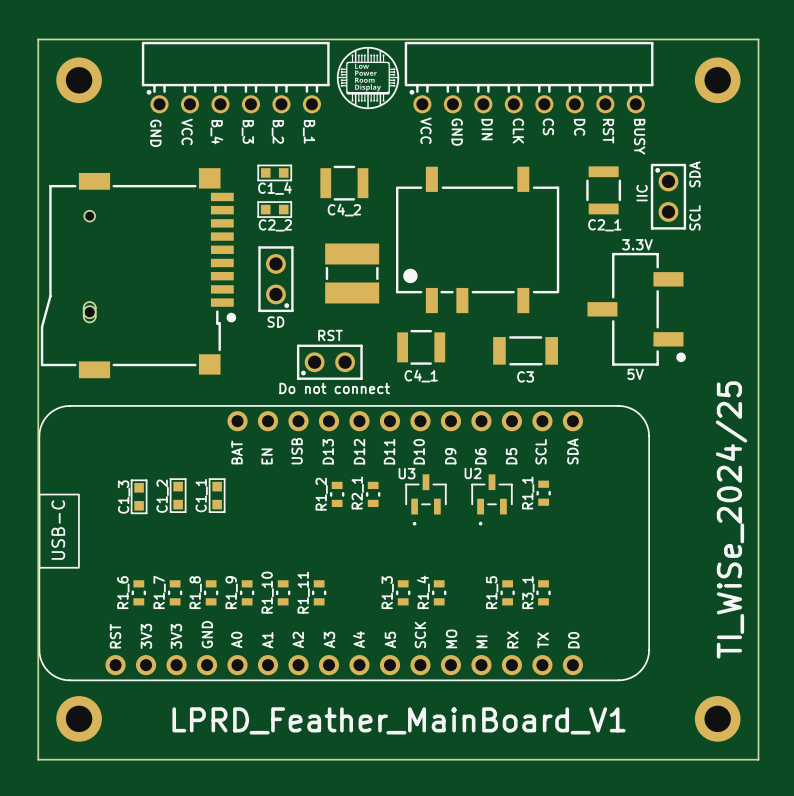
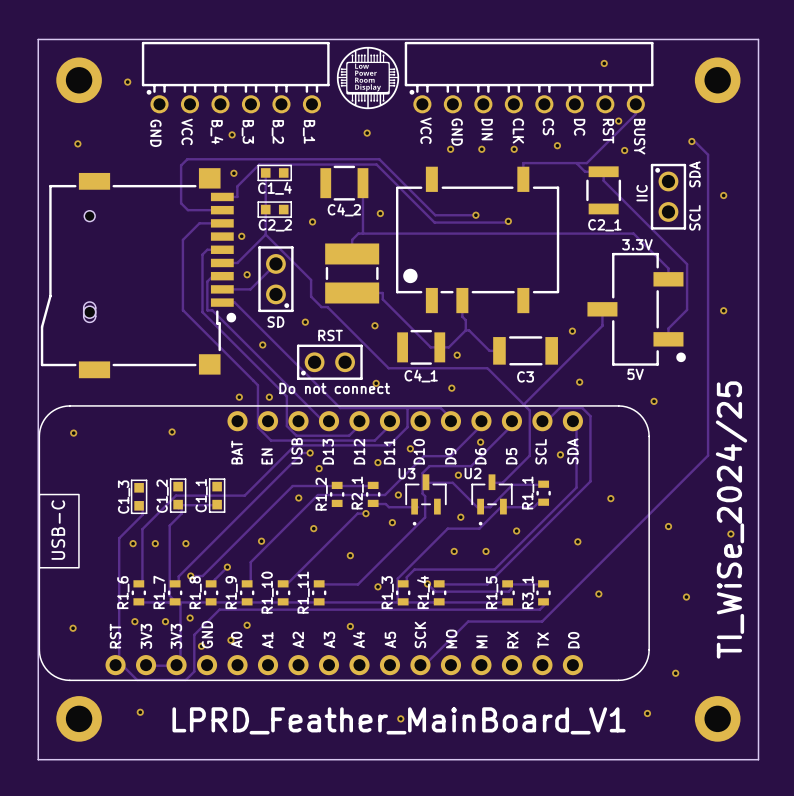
via: none -> (604, 63)
via: none -> (127, 82)
track: none -> (635, 104) (635, 114) (586, 163) (523, 163) (523, 179)
via: none -> (618, 121)
via: none -> (367, 133)
via: none -> (232, 134)
via: none -> (691, 141)
track: none -> (695, 142) (708, 154) (708, 455) (542, 621) (468, 621) (424, 665)
via: none -> (77, 143)
via: none -> (557, 145)
via: none -> (450, 149)
via: none -> (481, 149)
via: none -> (514, 149)
via: none -> (624, 150)
track: none -> (577, 163) (585, 171) (603, 171) (603, 180) (687, 264) (687, 309) (668, 328) (668, 339)
track: none -> (265, 172) (265, 234)
via: none -> (233, 173)
track: none -> (362, 183) (362, 233)
via: none -> (723, 195)
track: none -> (222, 196) (237, 196) (237, 186) (259, 164) (376, 164) (434, 222) (508, 221)
track: none -> (222, 210) (187, 210) (181, 203) (181, 165) (187, 159) (379, 159) (435, 215) (475, 215)
via: none -> (380, 213)
via: none -> (475, 215)
via: none -> (312, 221)
via: none -> (508, 221)
track: none -> (222, 223) (199, 223) (182, 239) (182, 310) (253, 380)
track: none -> (265, 234) (237, 262) (222, 262)
track: none -> (265, 234) (311, 280) (311, 296) (321, 307) (327, 307) (388, 368) (486, 368)
via: none -> (241, 236)
track: none -> (222, 249) (207, 249) (202, 254) (202, 312) (286, 396) (286, 426) (296, 435) (349, 435) (363, 421)
track: none -> (352, 253) (352, 239) (358, 233) (633, 233) (668, 268) (668, 279)
track: none -> (275, 263) (250, 289) (222, 289)
via: none -> (247, 274)
track: none -> (222, 276) (212, 276) (207, 281) (207, 310) (212, 310) (323, 421) (332, 421)
track: none -> (352, 292) (382, 292) (382, 299) (430, 347) (448, 347) (465, 330)
track: none -> (462, 300) (462, 316) (465, 320) (465, 330)
track: none -> (222, 302) (234, 302) (340, 408) (440, 408) (454, 421)
track: none -> (602, 309) (602, 325) (523, 404)
via: none -> (723, 310)
via: none -> (305, 322)
via: none -> (374, 325)
track: none -> (465, 330) (469, 330) (489, 350) (499, 350)
via: none -> (572, 331)
via: none -> (262, 344)
via: none -> (457, 355)
track: none -> (487, 368) (529, 410) (529, 455) (502, 482) (495, 482)
track: none -> (253, 381) (257, 385) (257, 427) (271, 440) (374, 440) (393, 421)
via: none -> (579, 382)
via: none -> (376, 383)
via: none -> (451, 388)
via: none -> (239, 397)
via: none -> (269, 397)
via: none -> (654, 401)
track: none -> (407, 408) (407, 427) (389, 445) (294, 445) (244, 495) (176, 495) (142, 529) (142, 584)
track: none -> (485, 421) (450, 456) (423, 456) (385, 495) (317, 495) (250, 562) (250, 584)
track: none -> (515, 421) (471, 466) (429, 466) (422, 473) (425, 517) (358, 584) (322, 584)
track: none -> (546, 421) (559, 408) (582, 408) (590, 416) (590, 481) (487, 584) (442, 584)
track: none -> (576, 421) (576, 487) (494, 569) (414, 569) (406, 577) (406, 584)
via: none -> (172, 431)
via: none -> (73, 433)
via: none -> (480, 442)
via: none -> (410, 448)
track: none -> (310, 453) (302, 453) (178, 576) (178, 584)
via: none -> (310, 453)
via: none -> (560, 454)
via: none -> (377, 462)
via: none -> (319, 468)
via: none -> (458, 475)
track: none -> (429, 482) (452, 482) (477, 507) (490, 507) (512, 484) (547, 484)
track: none -> (376, 486) (292, 486) (202, 576) (190, 576)
via: none -> (398, 495)
via: none -> (298, 498)
via: none -> (610, 498)
track: none -> (547, 502) (538, 502) (533, 507) (500, 507) (479, 528) (447, 528) (397, 578) (397, 602)
track: none -> (376, 504) (385, 504) (388, 507) (418, 507)
track: none -> (220, 505) (181, 505) (181, 513) (169, 525) (169, 595) (176, 602)
track: none -> (142, 506) (142, 514) (119, 538) (119, 662) (137, 679) (185, 679) (194, 671) (194, 634) (219, 609) (539, 609) (547, 602)
track: none -> (365, 513) (357, 513) (286, 584)
via: none -> (365, 513)
via: none -> (460, 517)
via: none -> (392, 522)
via: none -> (668, 526)
via: none -> (313, 528)
via: none -> (516, 531)
via: none -> (730, 534)
via: none -> (261, 541)
via: none -> (577, 541)
via: none -> (133, 543)
via: none -> (155, 543)
via: none -> (185, 543)
via: none -> (454, 551)
via: none -> (486, 551)
via: none -> (350, 555)
track: none -> (227, 567) (214, 579) (214, 584)
via: none -> (227, 567)
via: none -> (190, 576)
track: none -> (427, 583) (435, 591) (508, 591) (511, 589) (511, 584) (547, 584)
via: none -> (427, 583)
via: none -> (377, 586)
via: none -> (598, 594)
via: none -> (686, 597)
track: none -> (142, 602) (511, 602)
track: none -> (178, 602) (180, 604) (180, 665) (149, 665)
via: none -> (190, 618)
via: none -> (134, 621)
via: none -> (165, 621)
via: none -> (247, 625)
via: none -> (350, 626)
via: none -> (73, 628)
via: none -> (230, 640)
via: none -> (201, 646)
via: none -> (675, 673)
via: none -> (140, 712)
via: none -> (647, 713)
via: none -> (400, 718)

